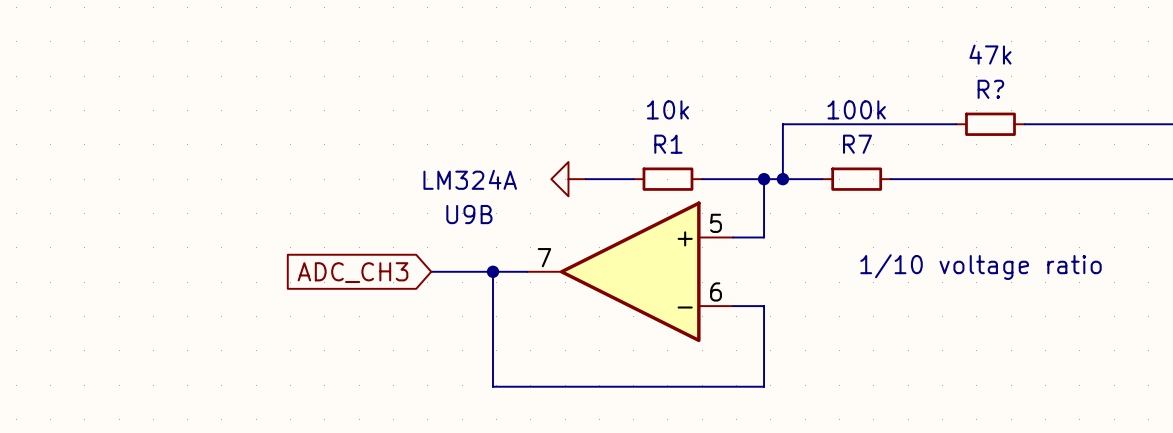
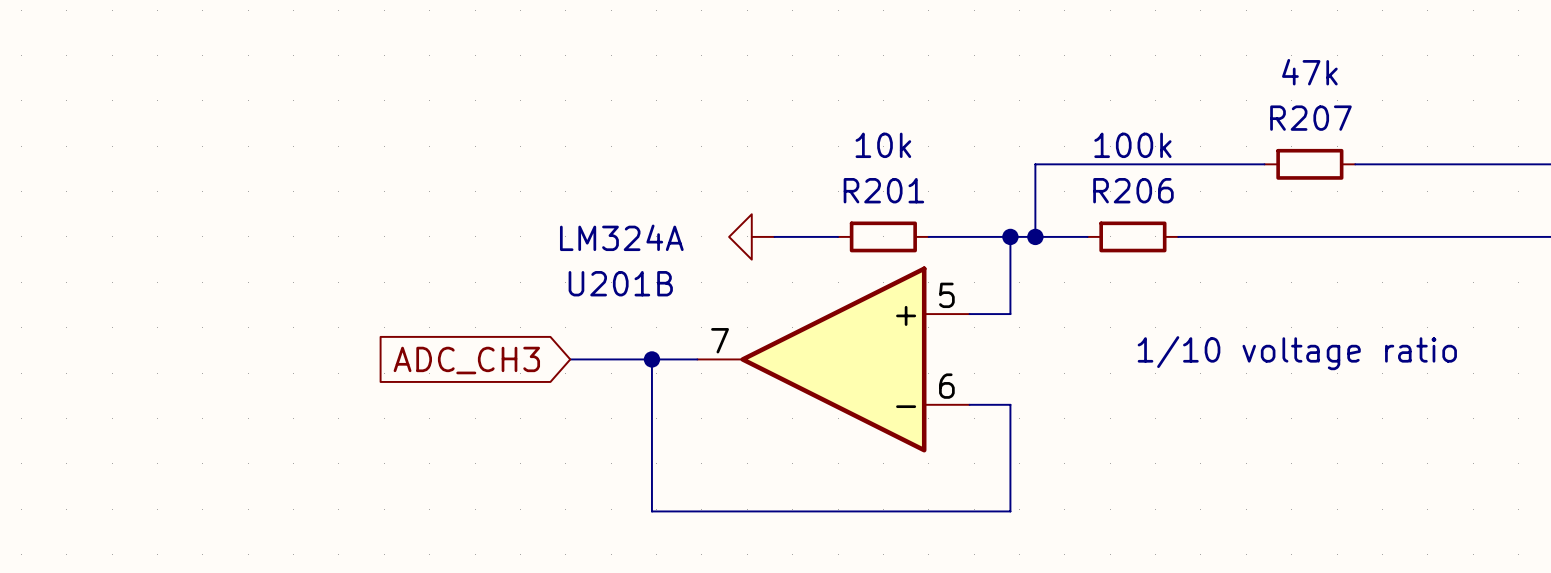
R? name: R? (990, 89) -> R207 (1310, 118)
R1 name: R1 (668, 144) -> R201 (883, 190)
R7 name: R7 (857, 144) -> R206 (1133, 190)
U9B name: U9B (469, 214) -> U201B (620, 283)

